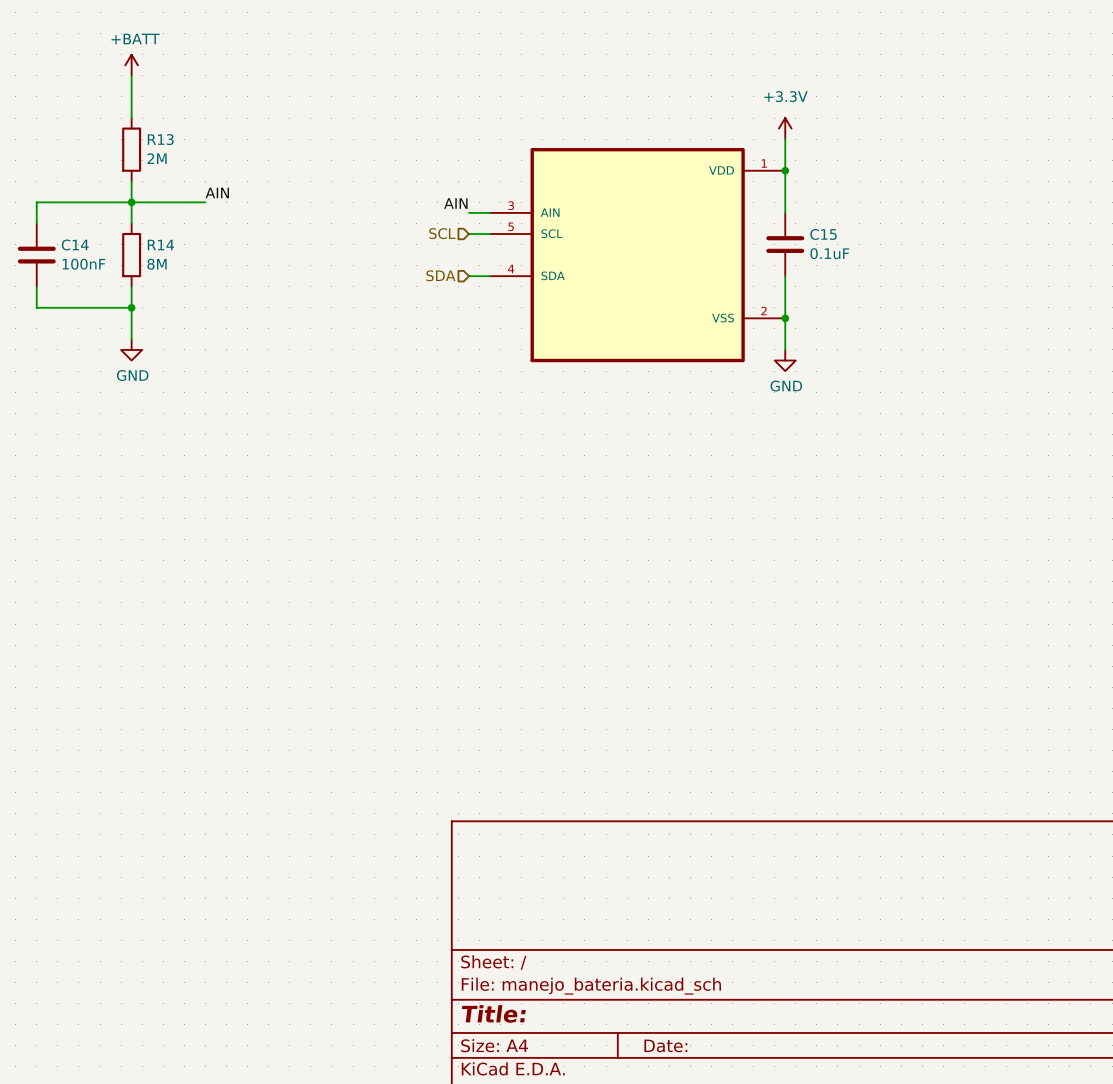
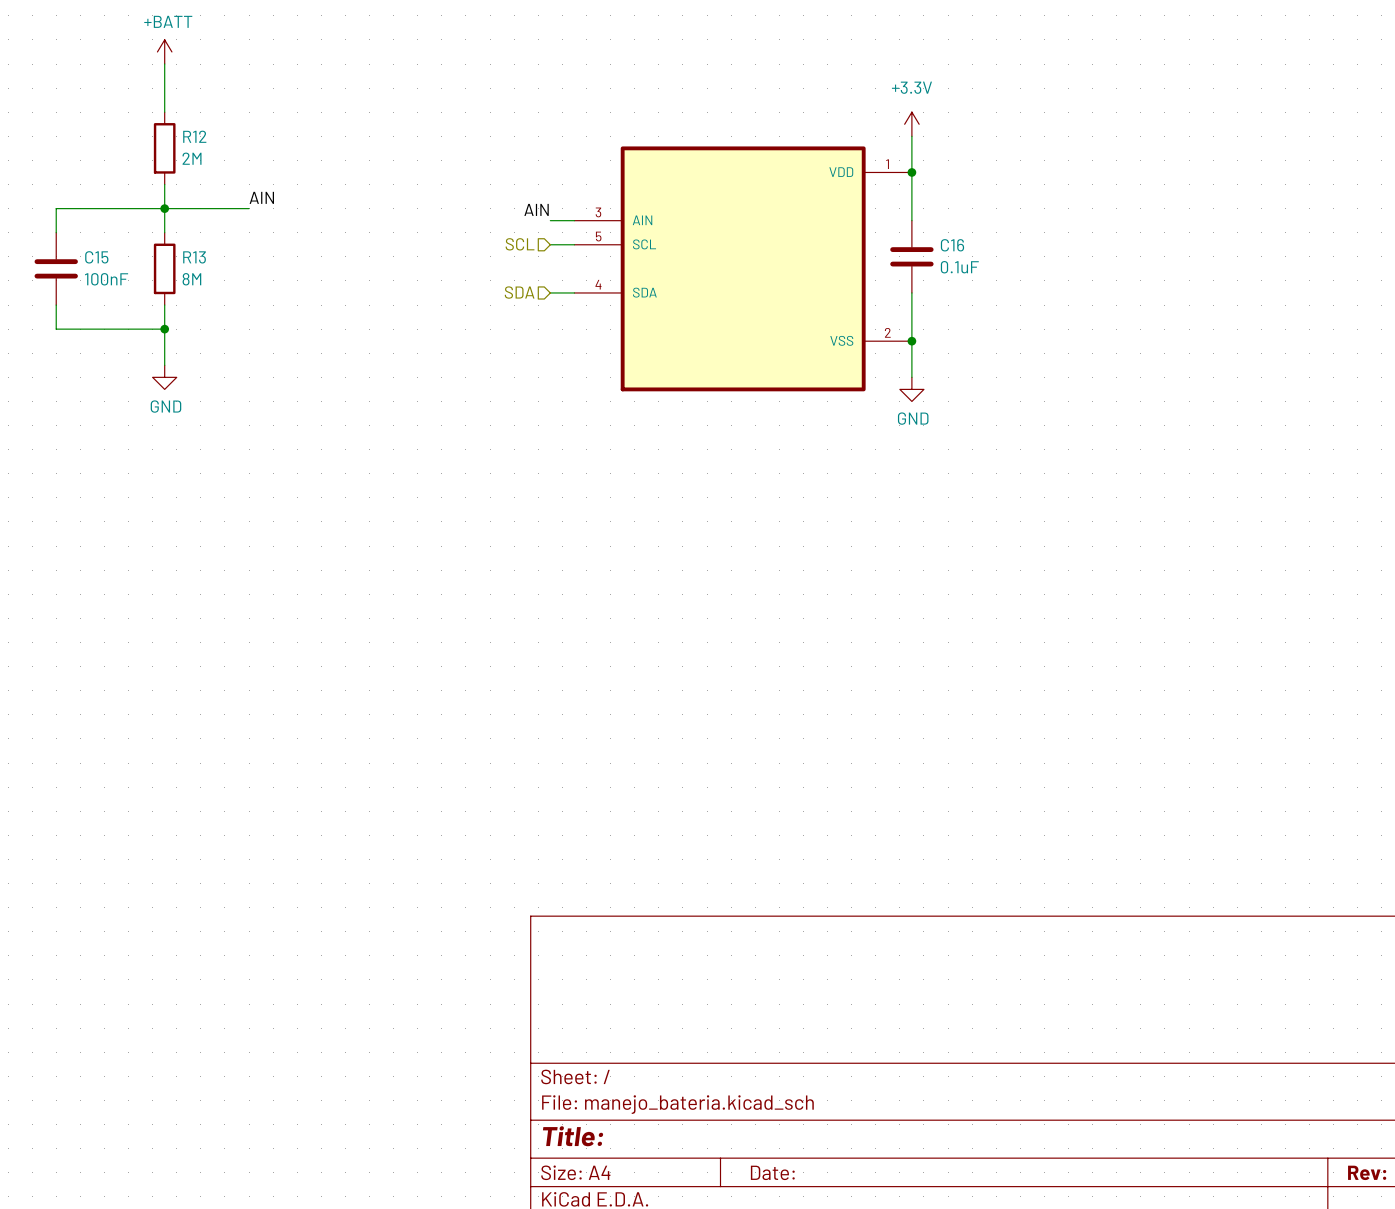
R13 name: R13 (160, 139) -> R12 (194, 136)
C15 name: C15 (823, 234) -> C16 (952, 245)
R14 name: R14 (160, 244) -> R13 (194, 257)
C14 name: C14 (75, 245) -> C15 (96, 257)

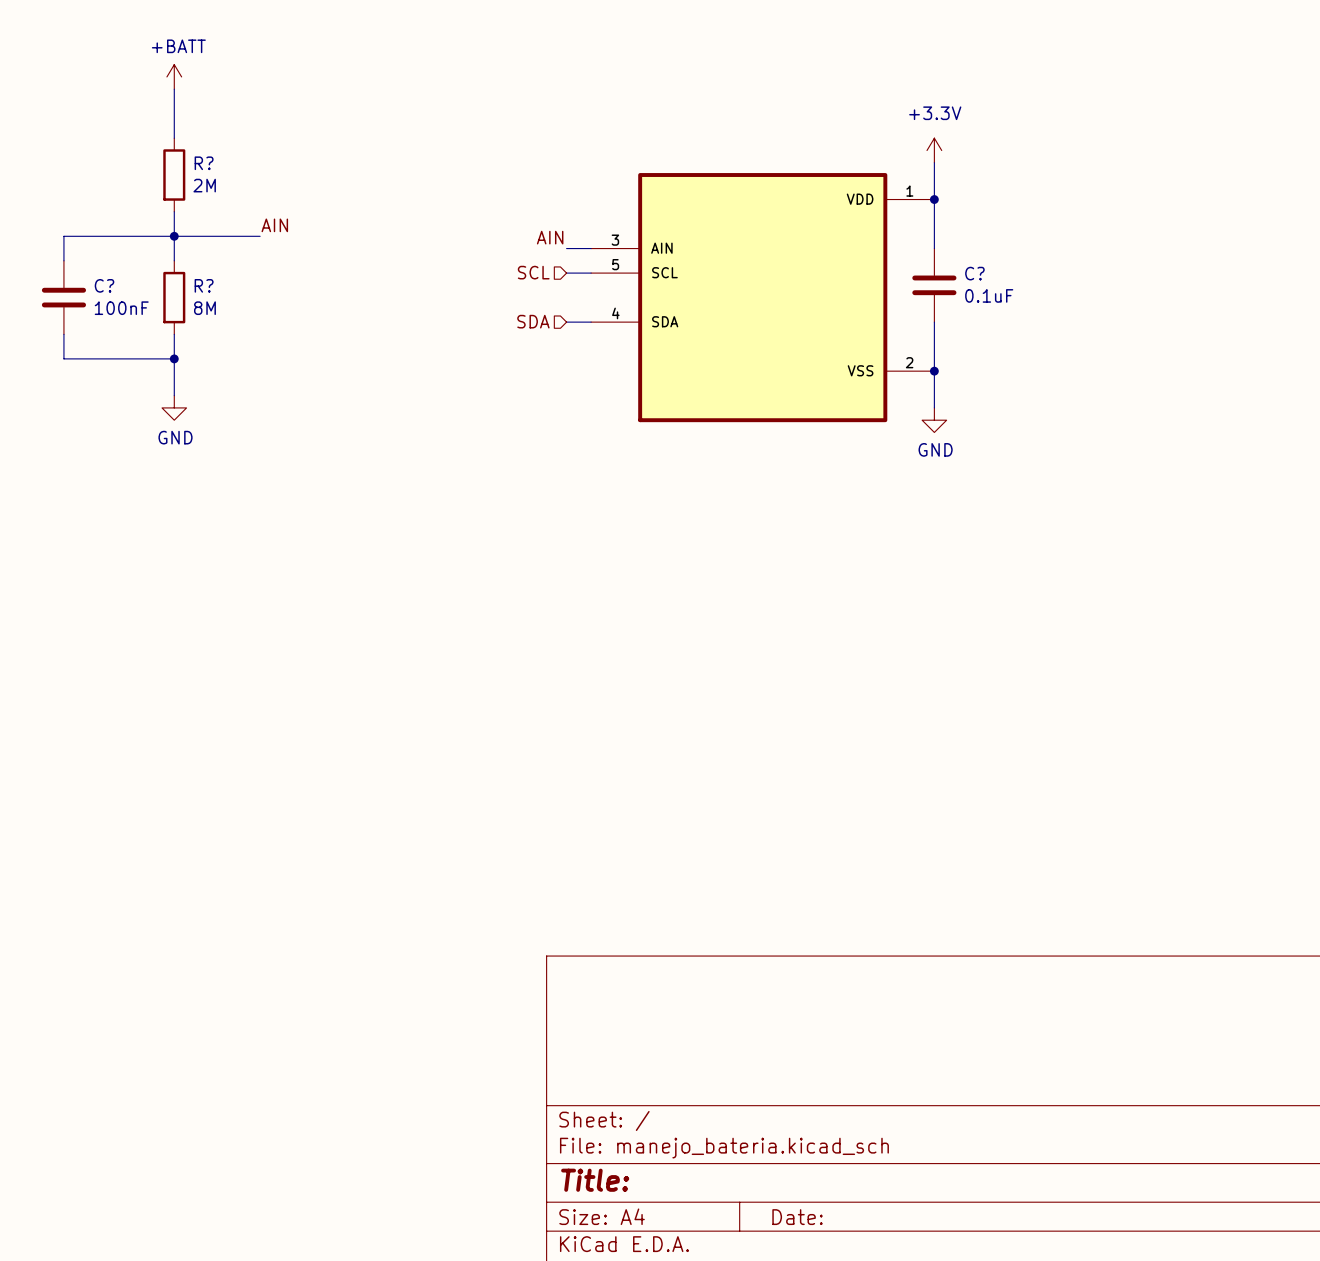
R12 name: R12 (194, 136) -> R? (204, 163)
C16 name: C16 (952, 245) -> C? (974, 273)
C15 name: C15 (96, 257) -> C? (104, 285)
R13 name: R13 (194, 257) -> R? (204, 285)

